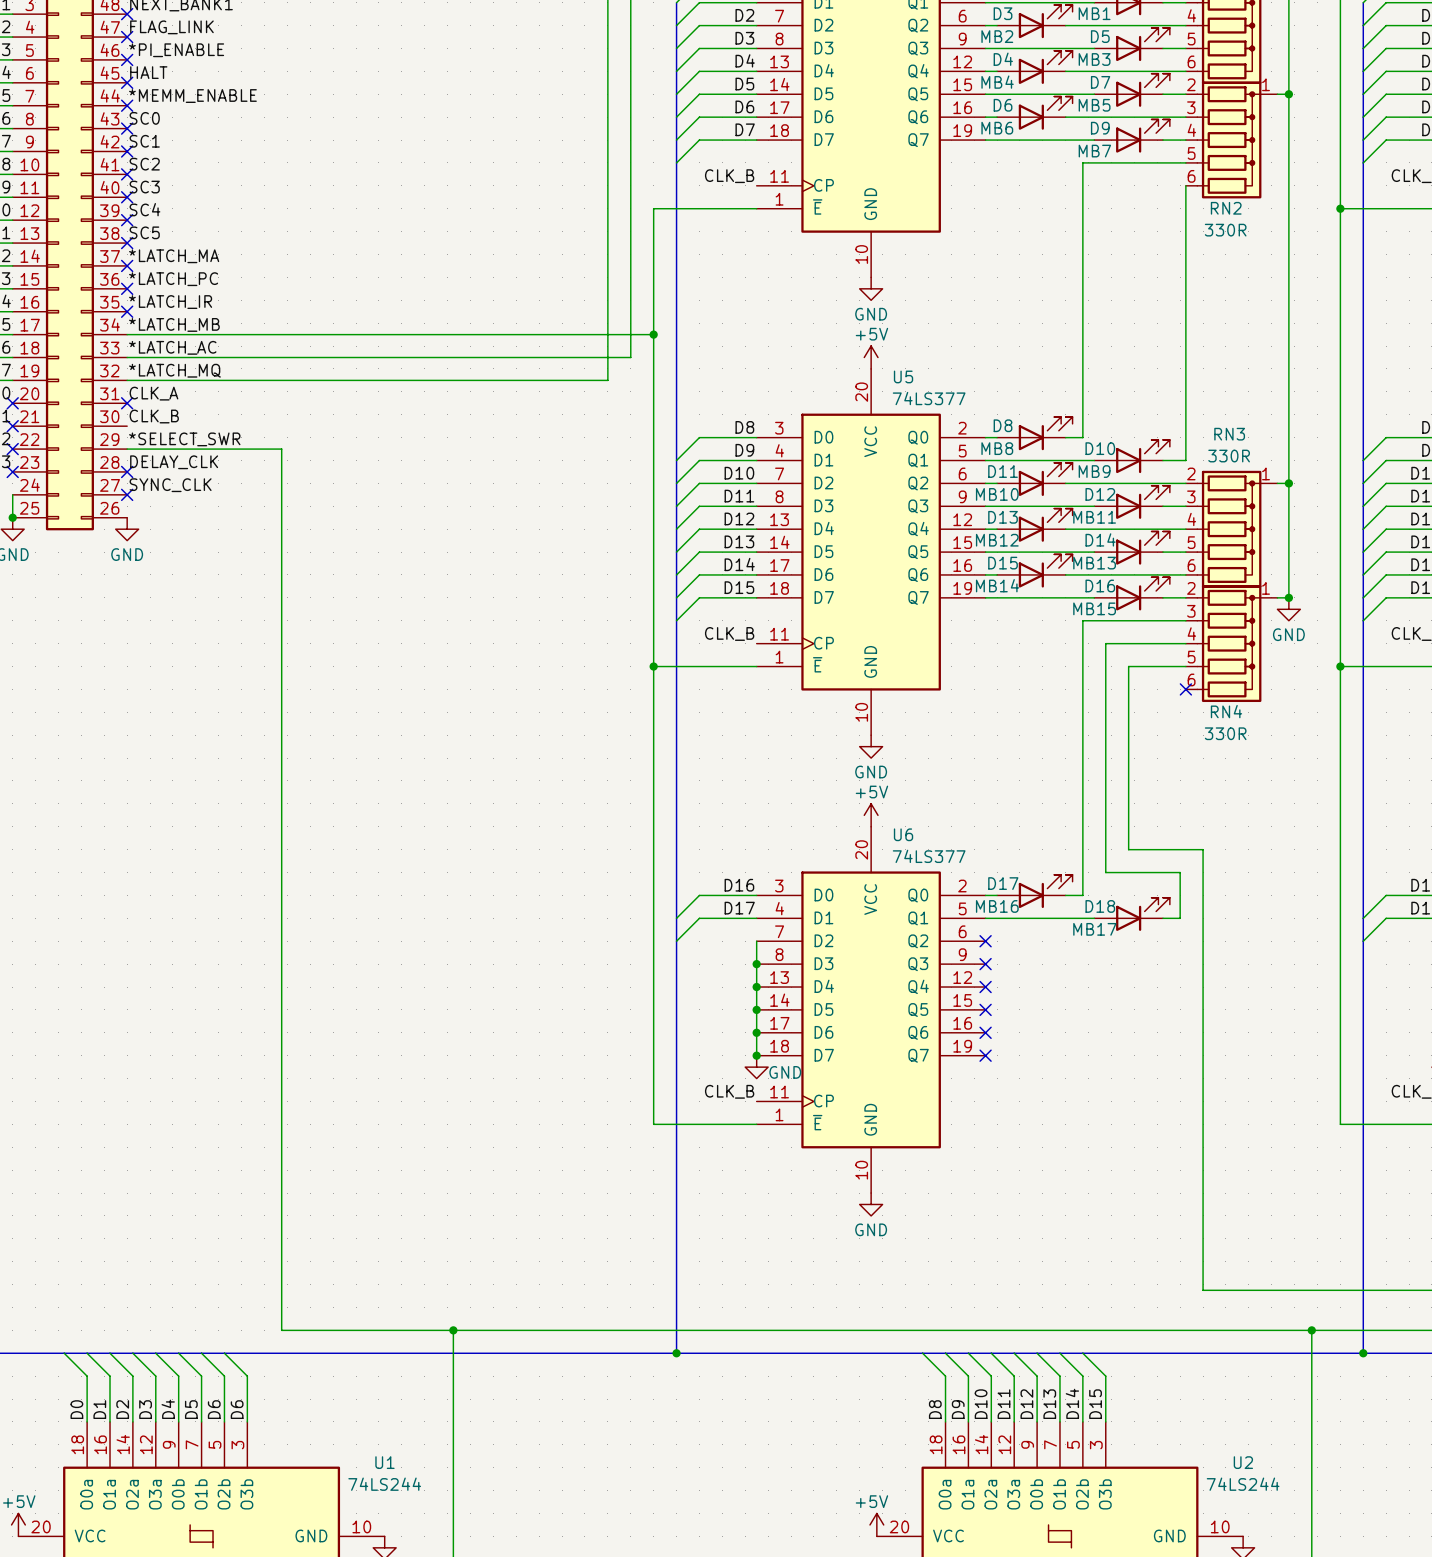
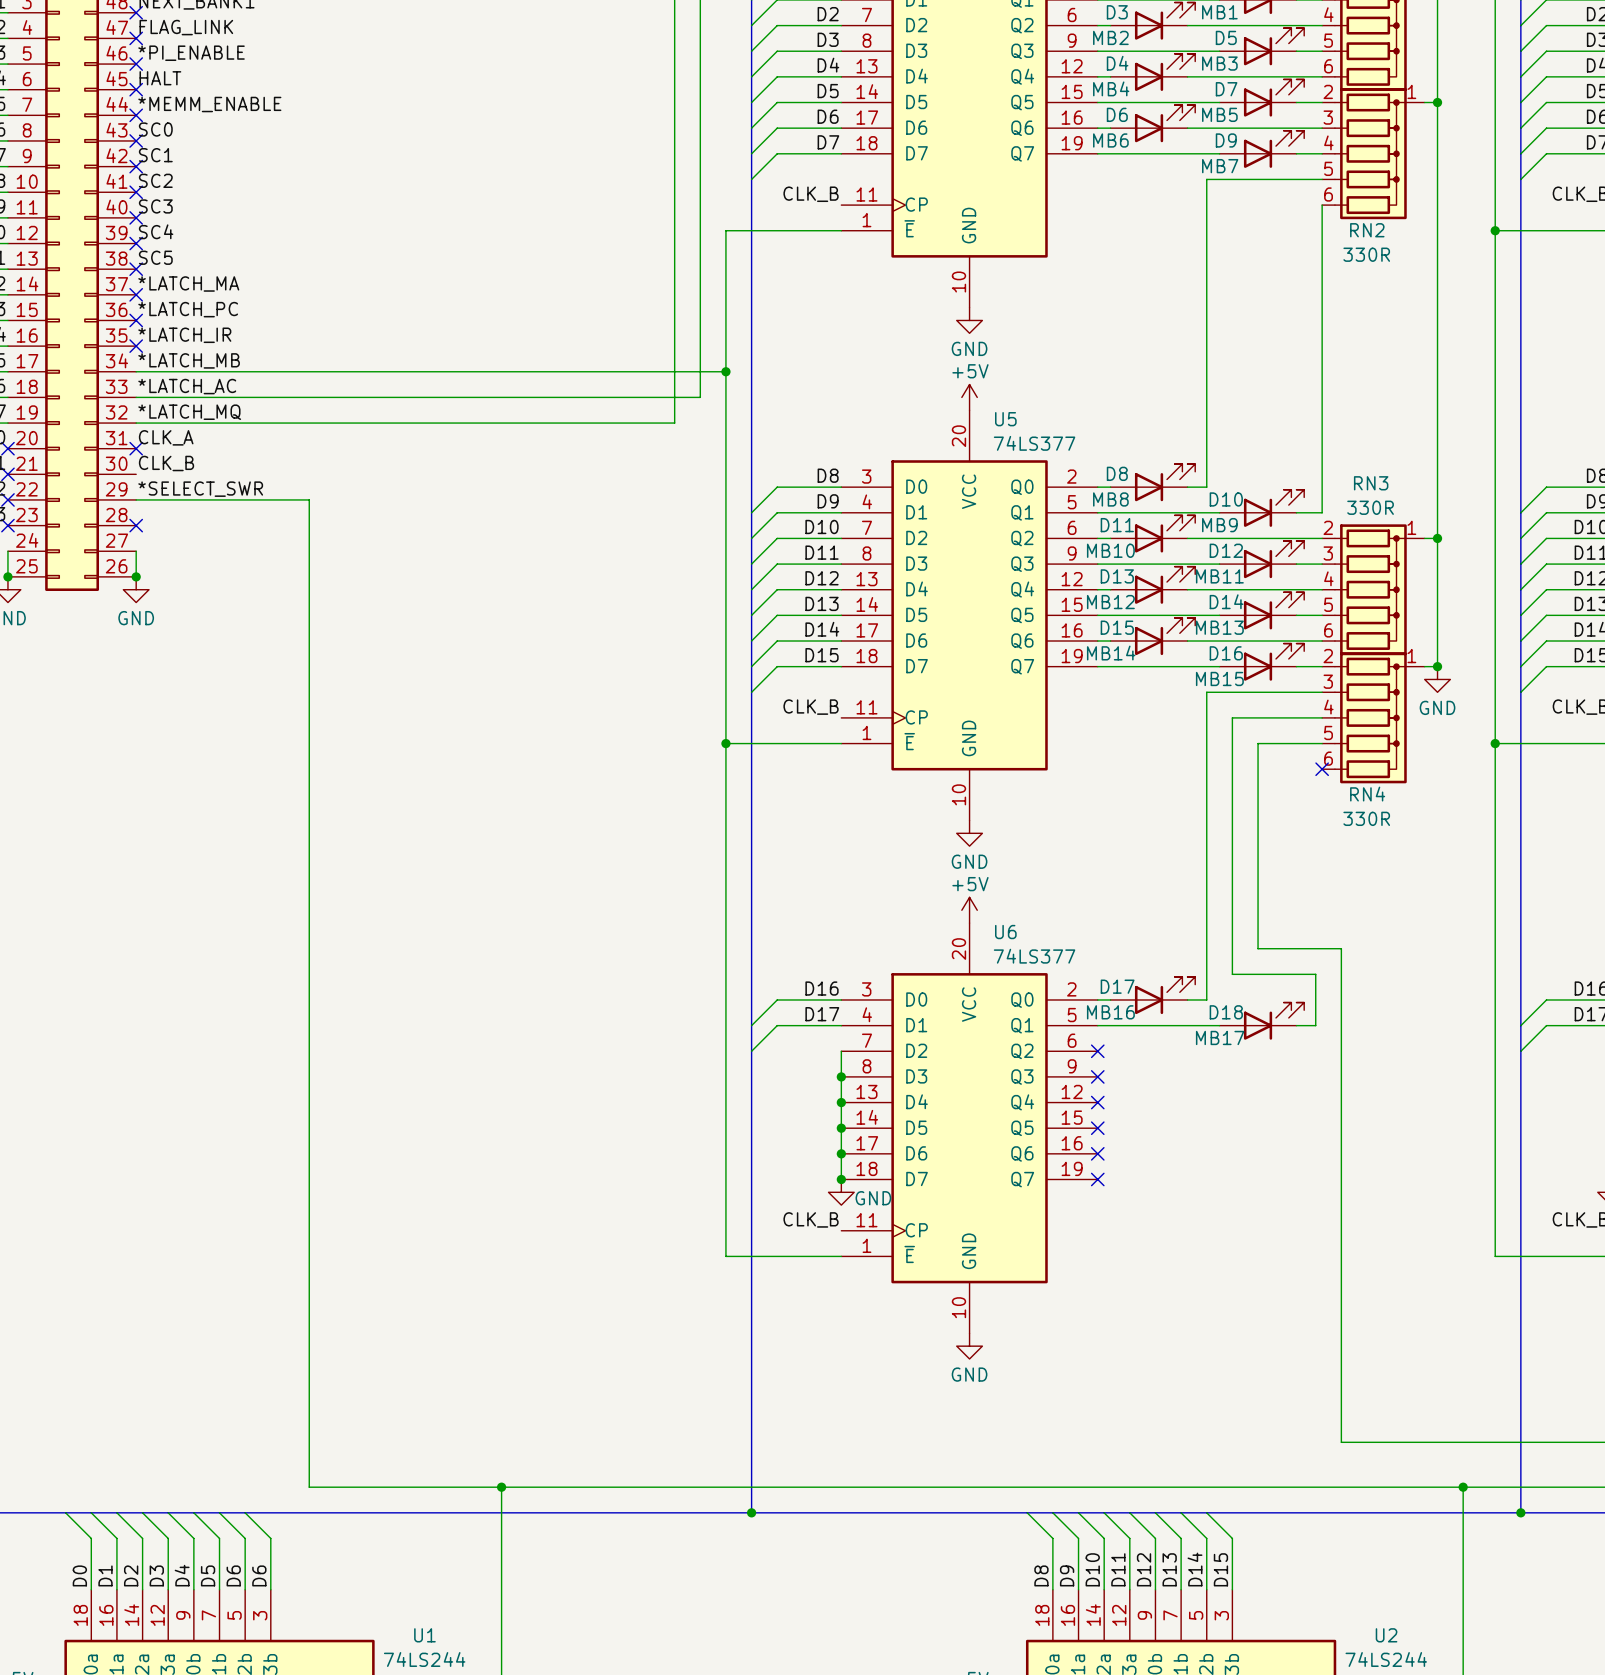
label: DELAY_CLK (174, 462) -> none
label: SYNC_CLK (170, 485) -> none
wire: none -> (136, 551) (136, 576)
no-connect mark: (127, 494) -> none
junction: none -> (136, 576)

